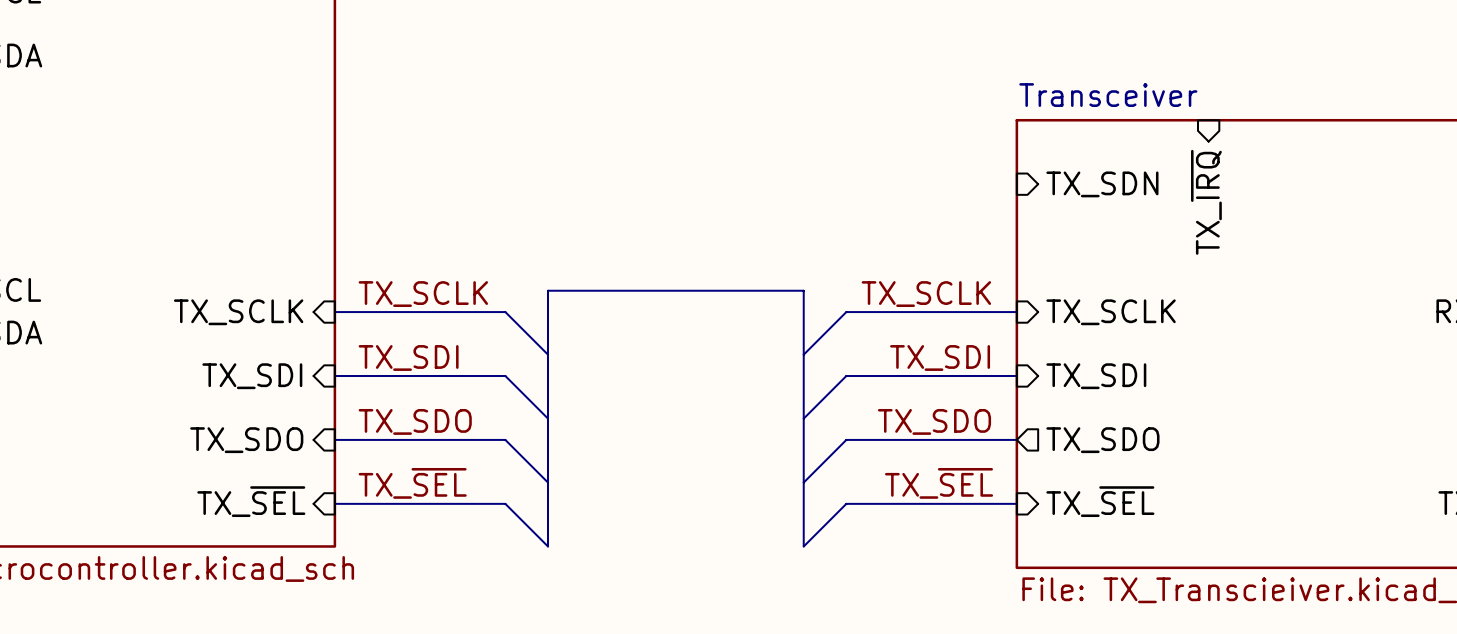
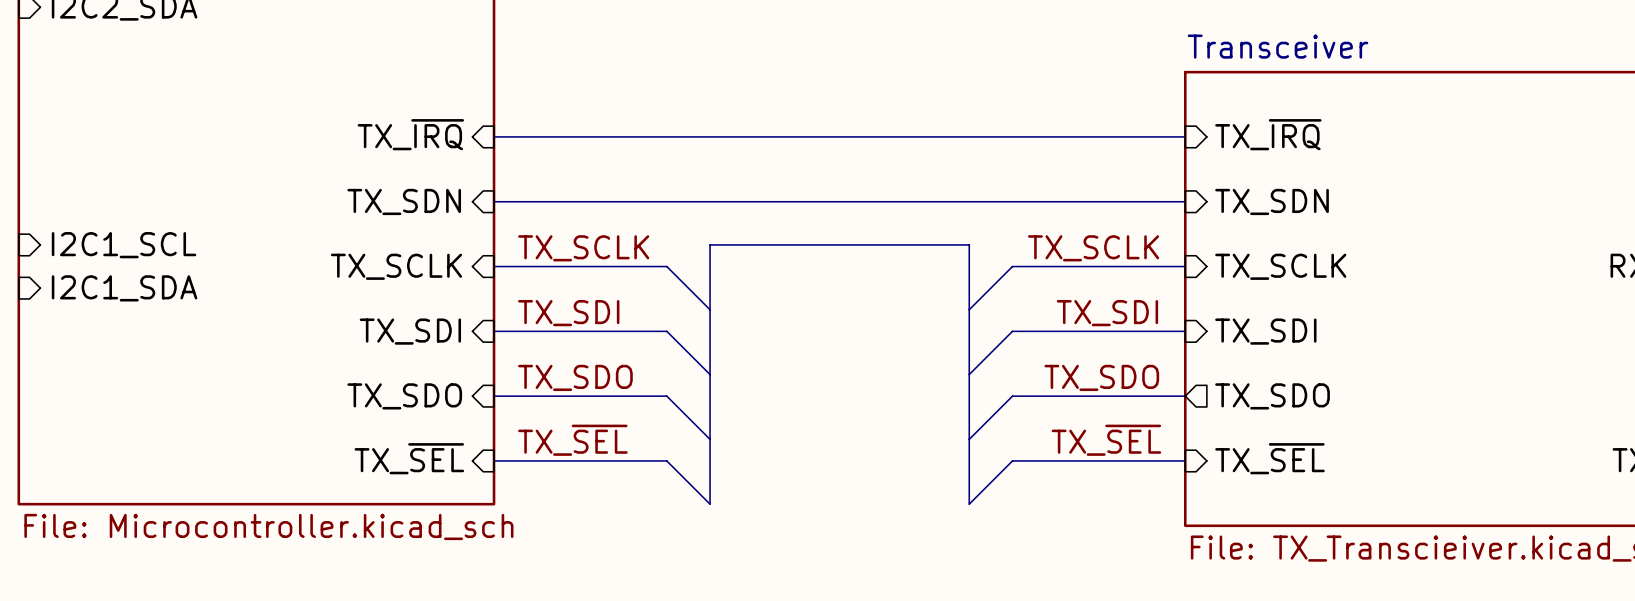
sheet pin: none -> TX_~{IRQ} (410, 134)
wire: none -> (494, 136) (1185, 136)
sheet pin: TX_SDN (1102, 184) -> TX_~{IRQ} (1268, 134)
sheet pin: TX_~{IRQ} (1206, 202) -> none
sheet pin: none -> TX_SDN (404, 201)
wire: none -> (494, 201) (1185, 201)
sheet pin: none -> TX_SDN (1272, 201)

